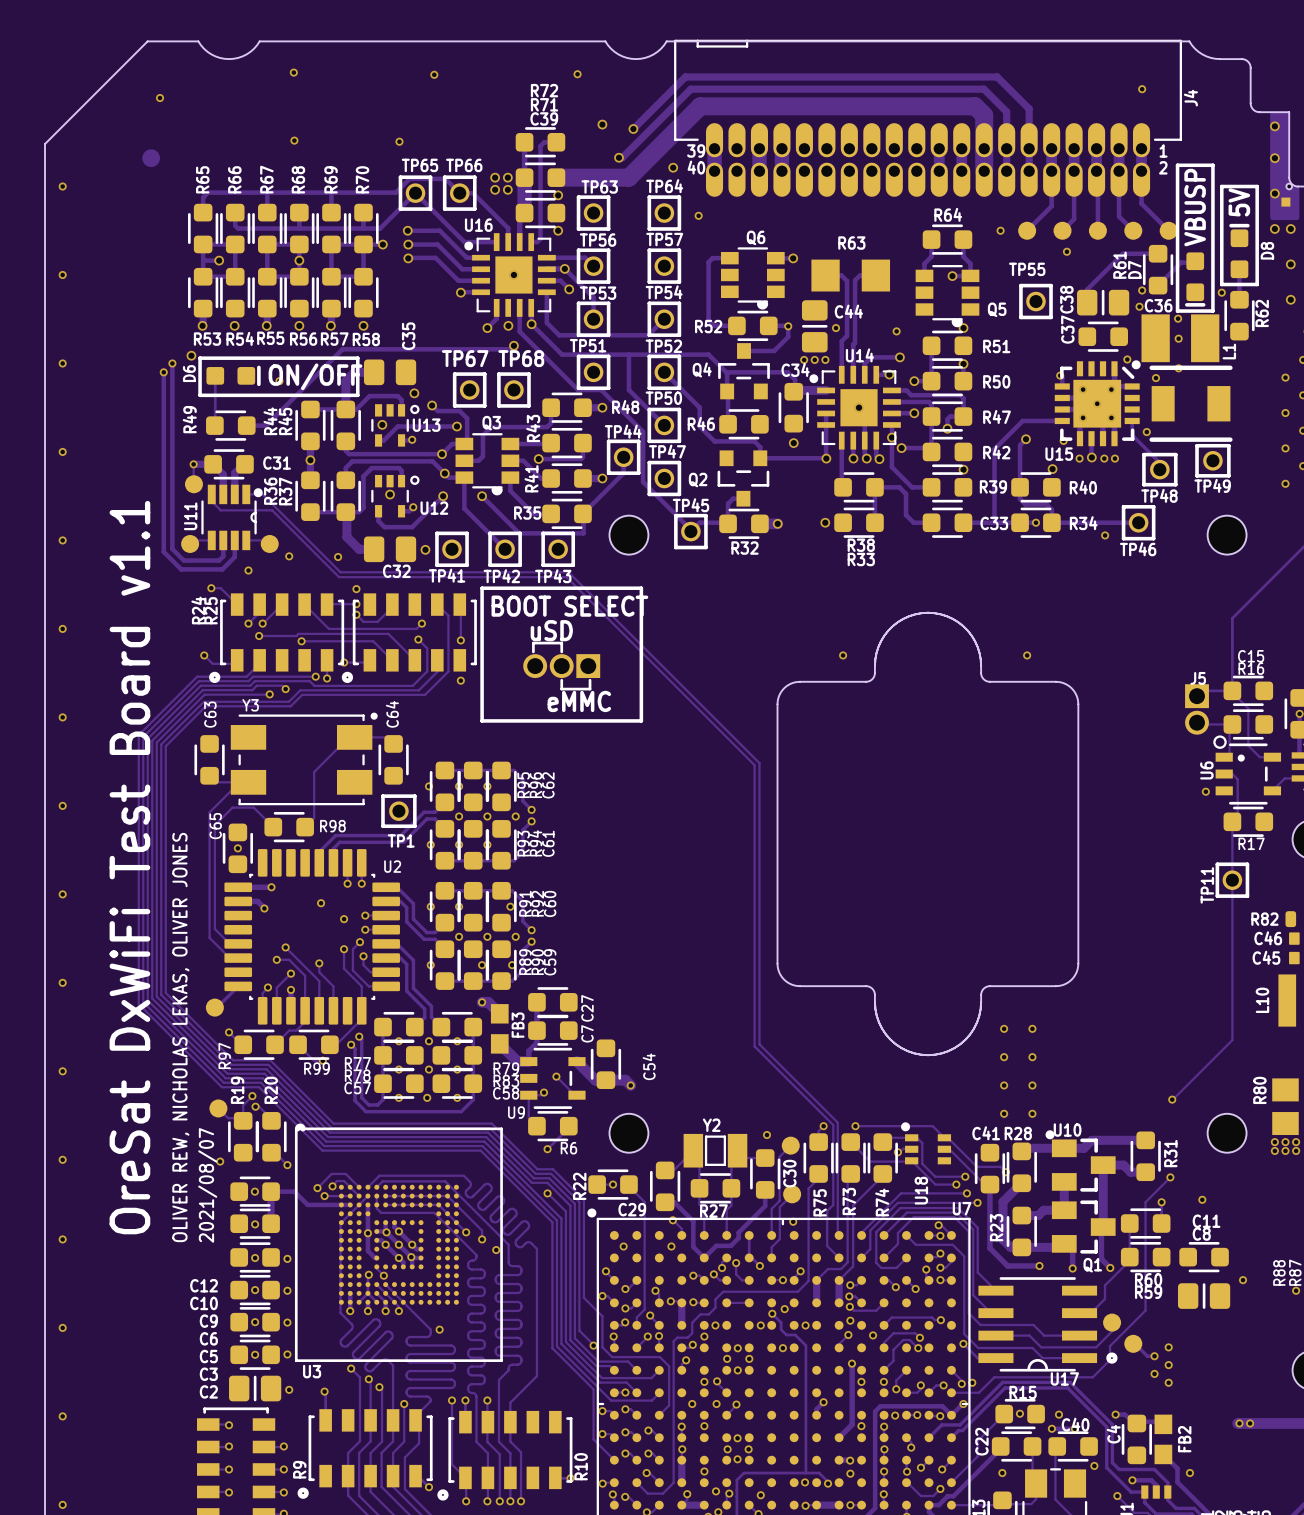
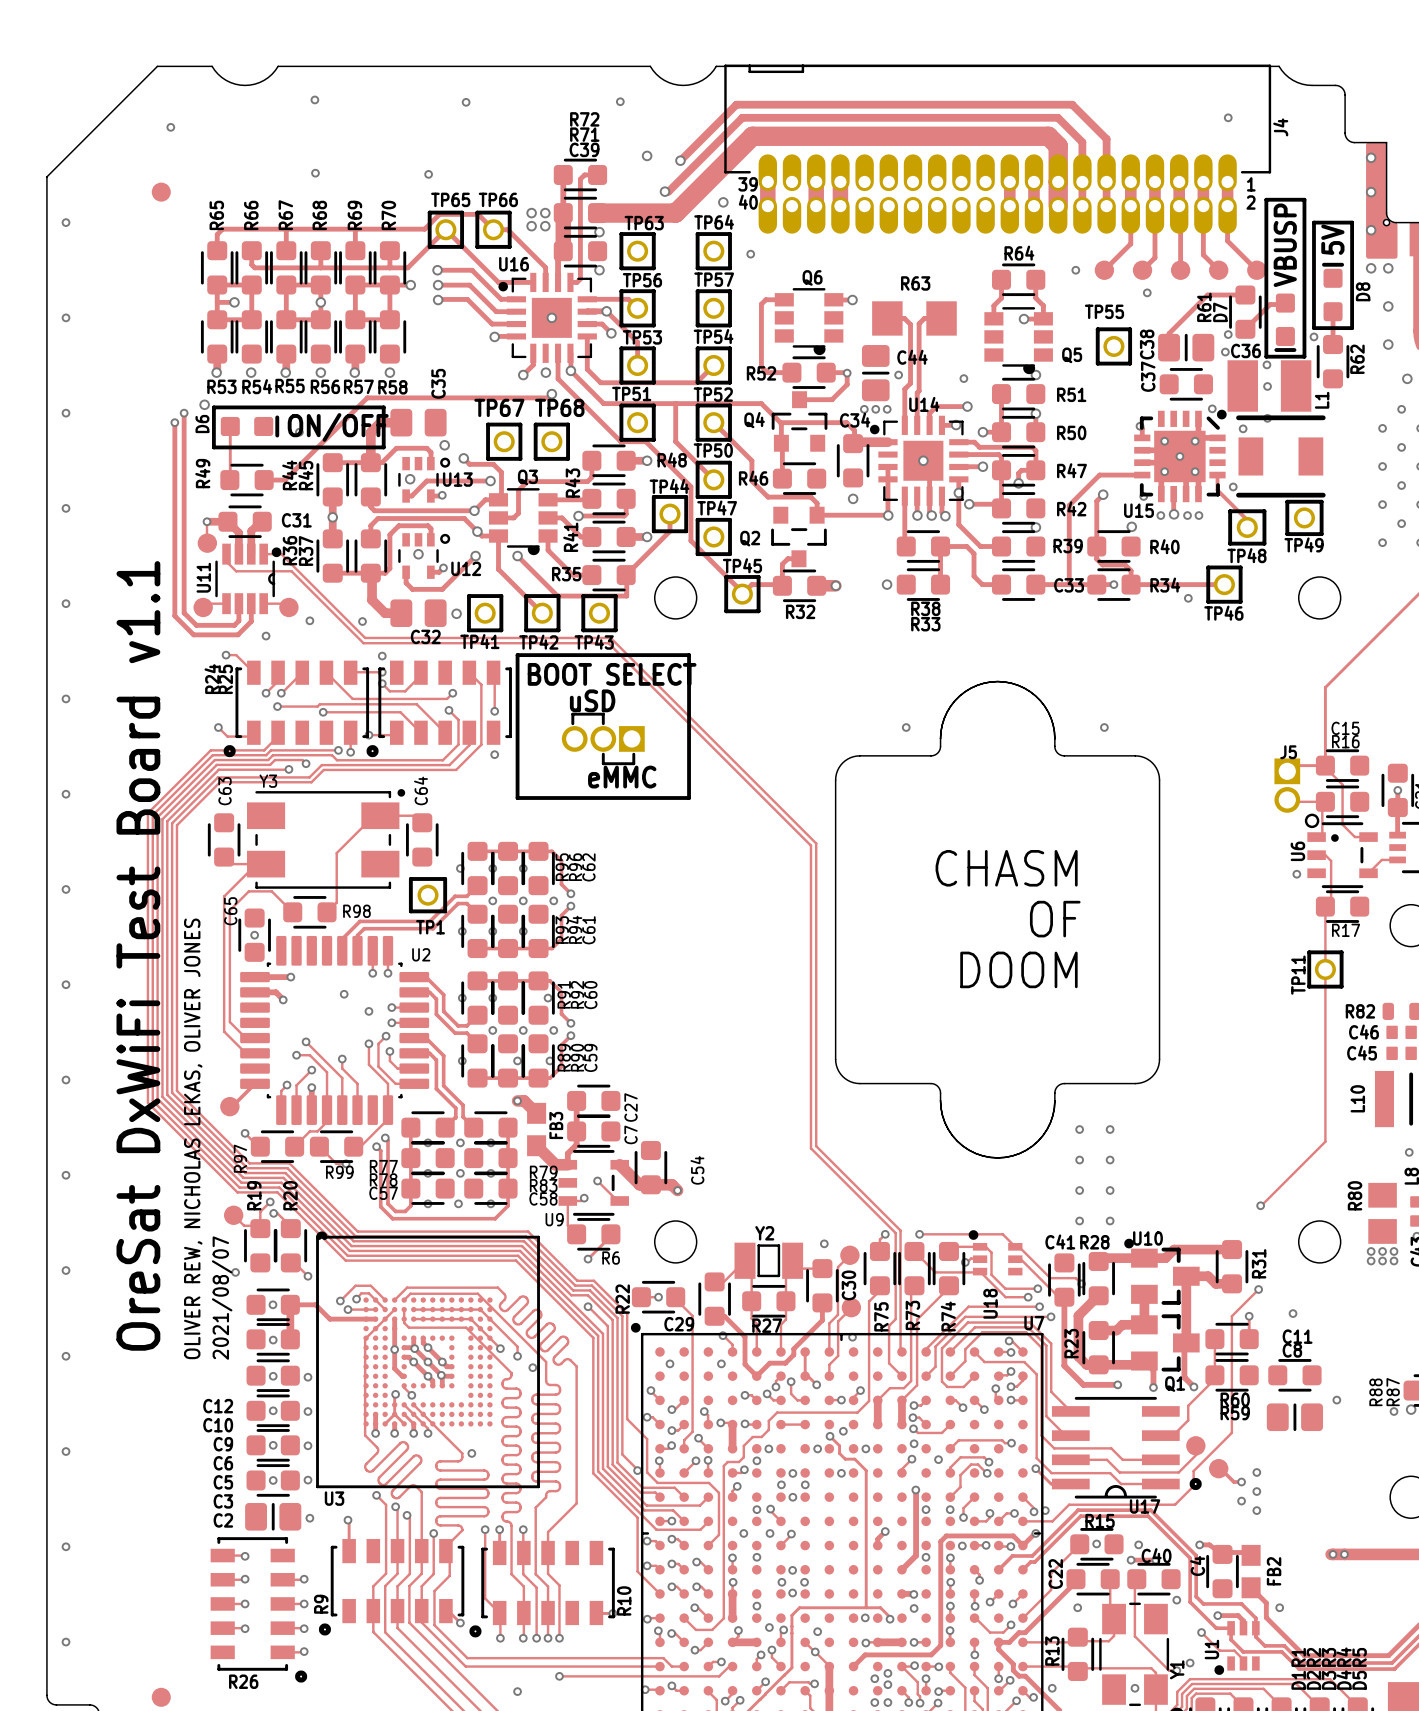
text: none -> CHASM (1006, 868)
text: none -> OF (1055, 919)
text: none -> DOOM (1018, 969)

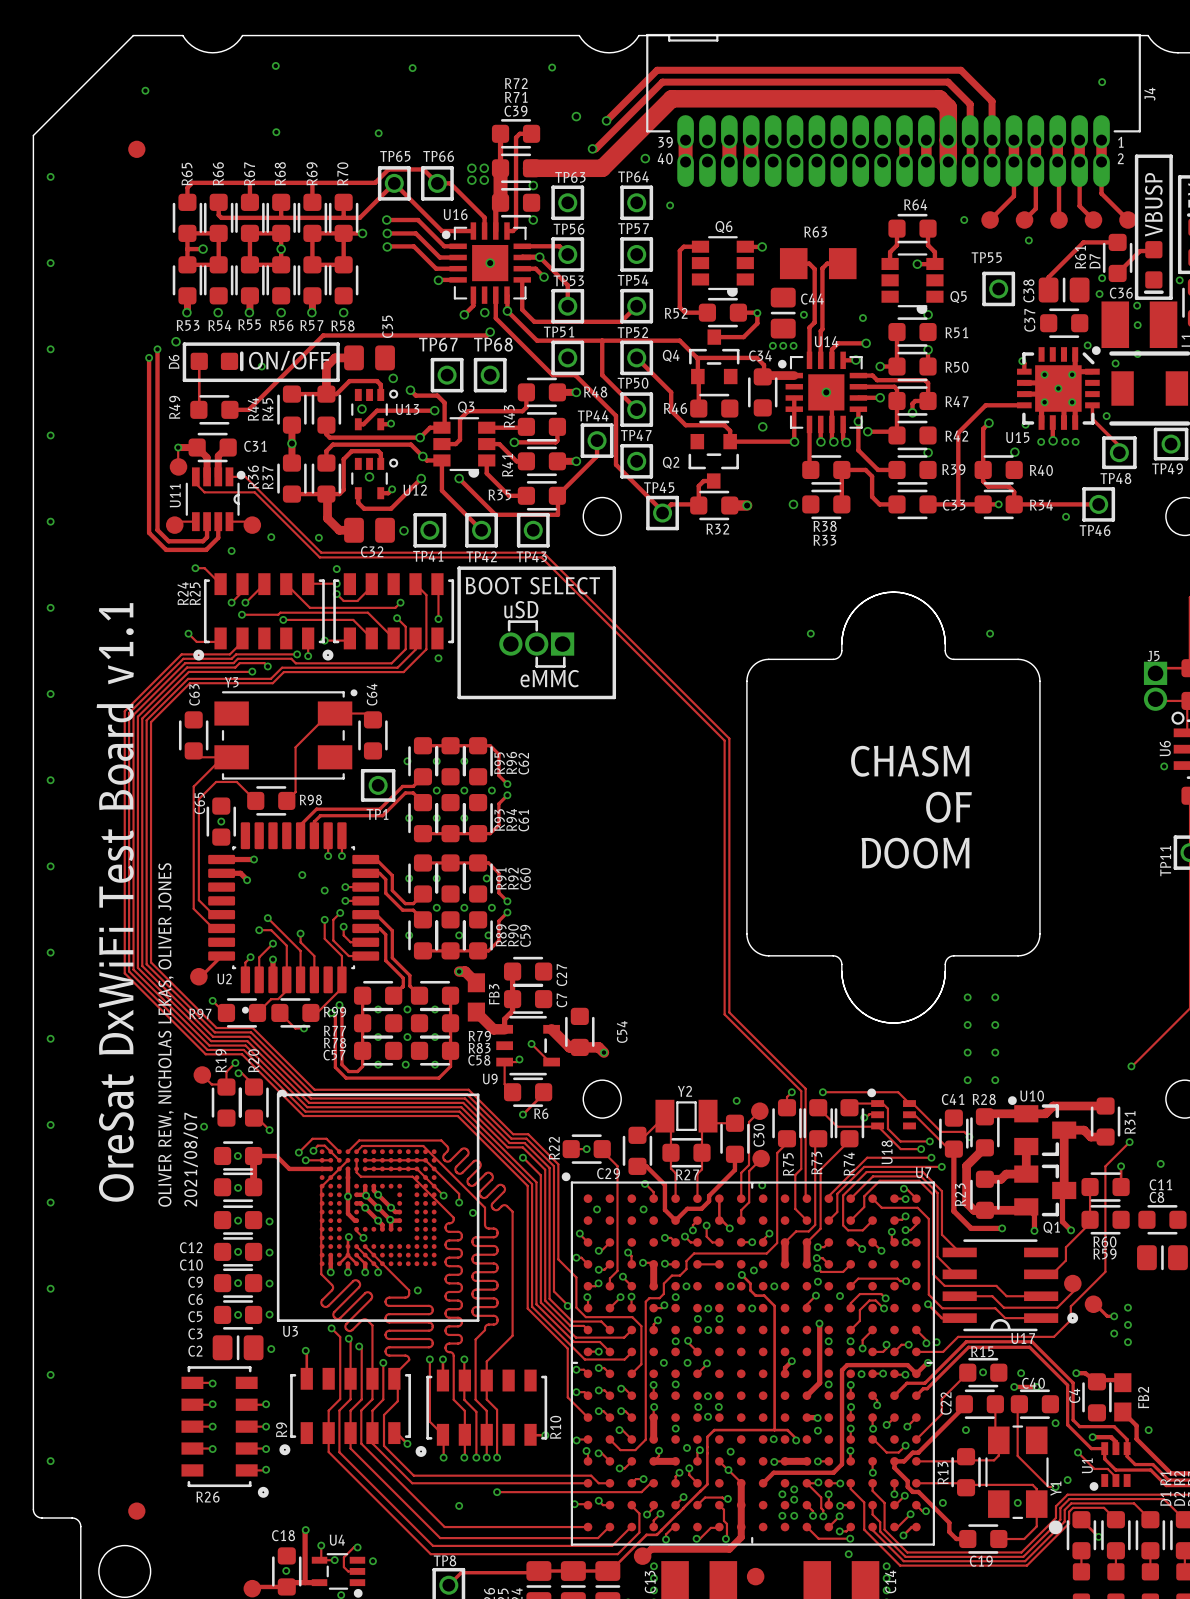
U2 footprint: [240, 935, 430, 1125] -> [208, 822, 380, 1014]
U2 name position: U2 (421, 954) -> U2 (224, 979)
R97 name rotation: 0° (240, 1158) -> 90° clockwise (200, 1013)
R99 name position: R99 (339, 1172) -> R99 (335, 1012)

